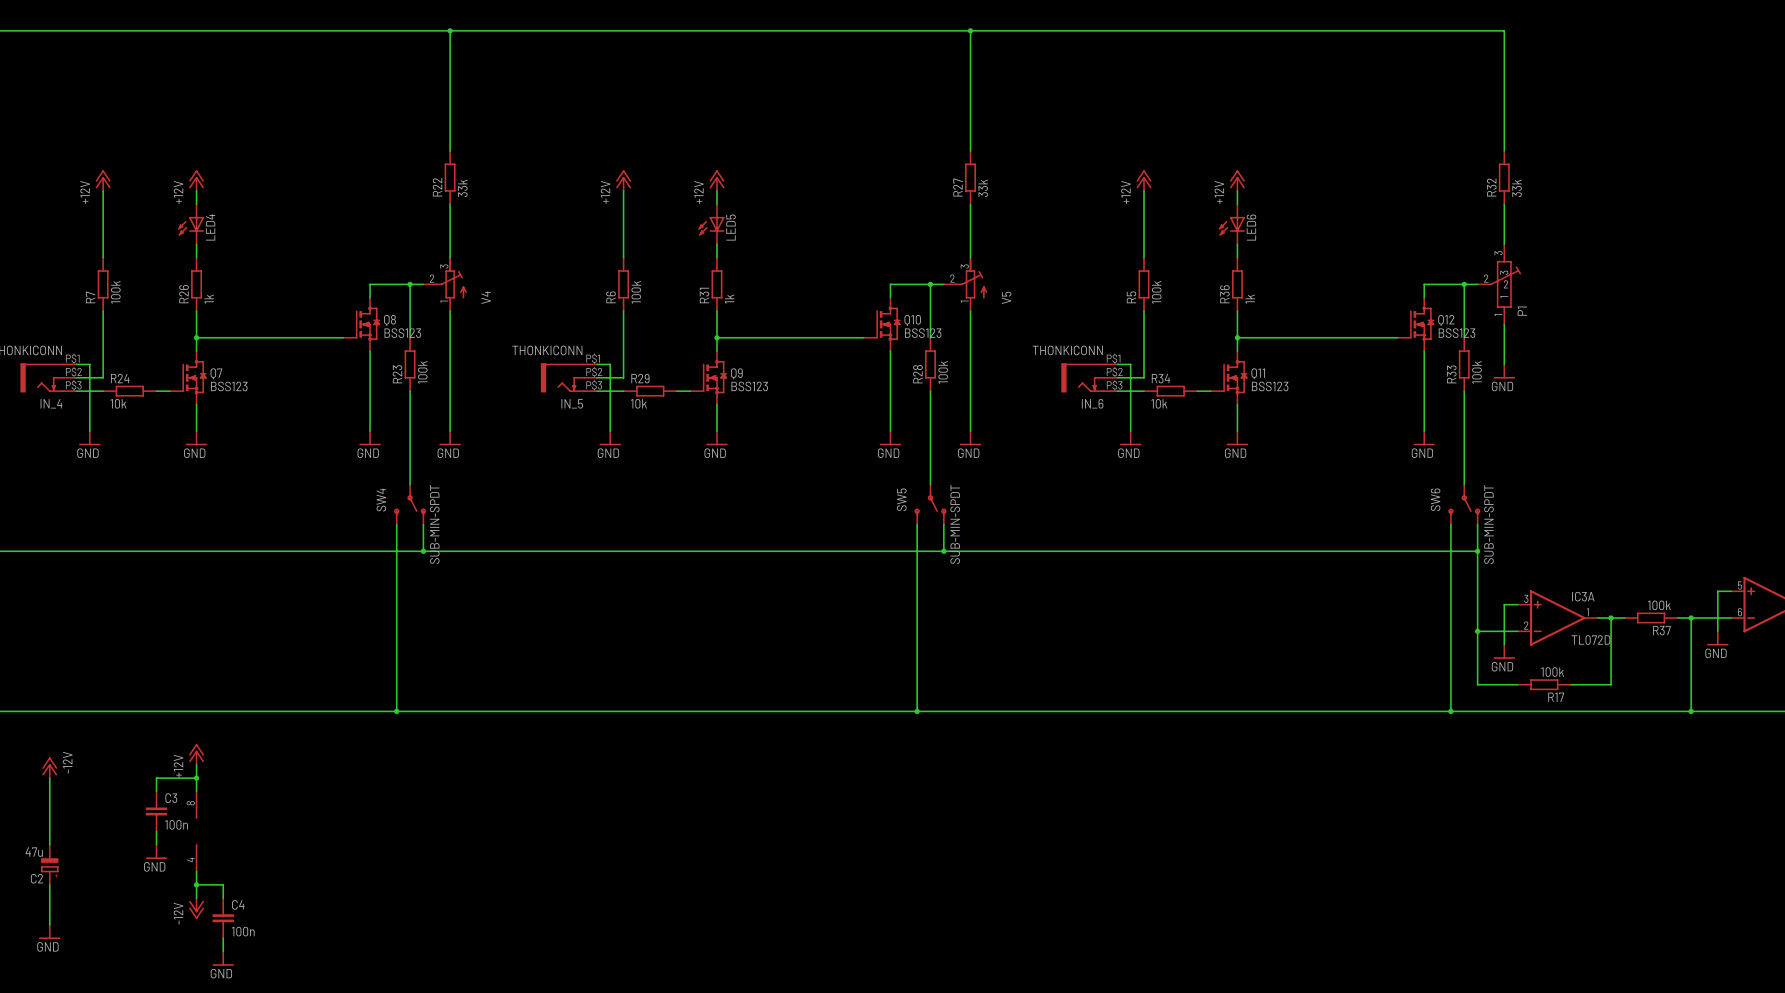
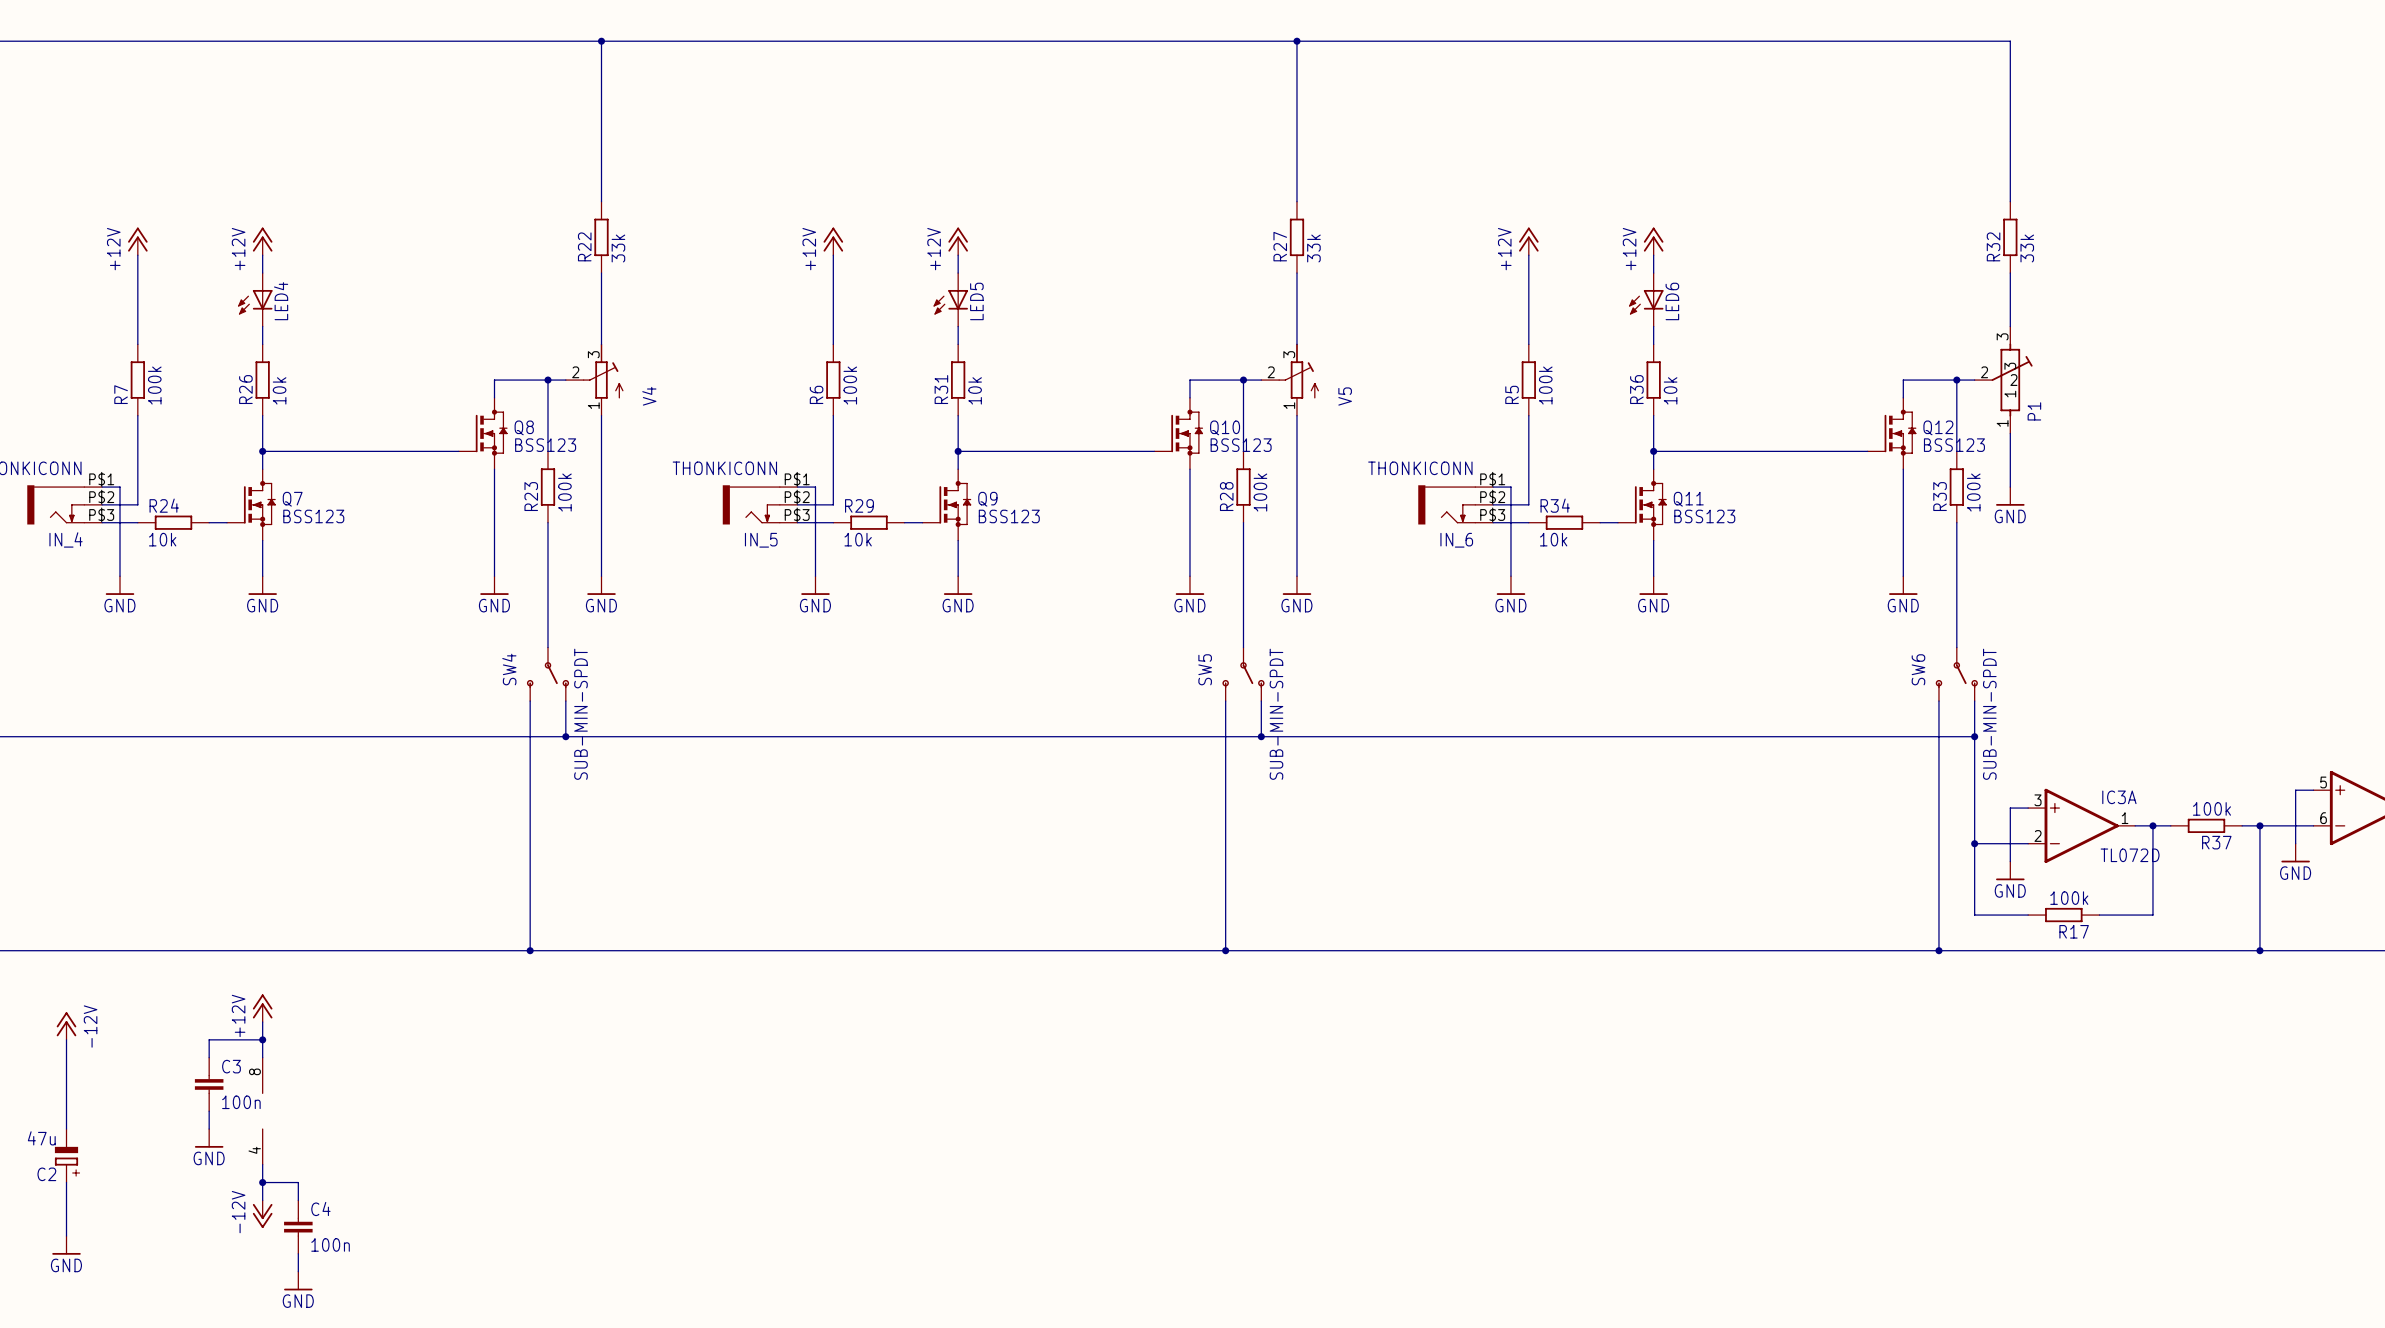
R26 value: 1k (209, 299) -> 10k (279, 390)
R31 value: 1k (729, 299) -> 10k (975, 390)
R36 value: 1k (1250, 299) -> 10k (1670, 390)

